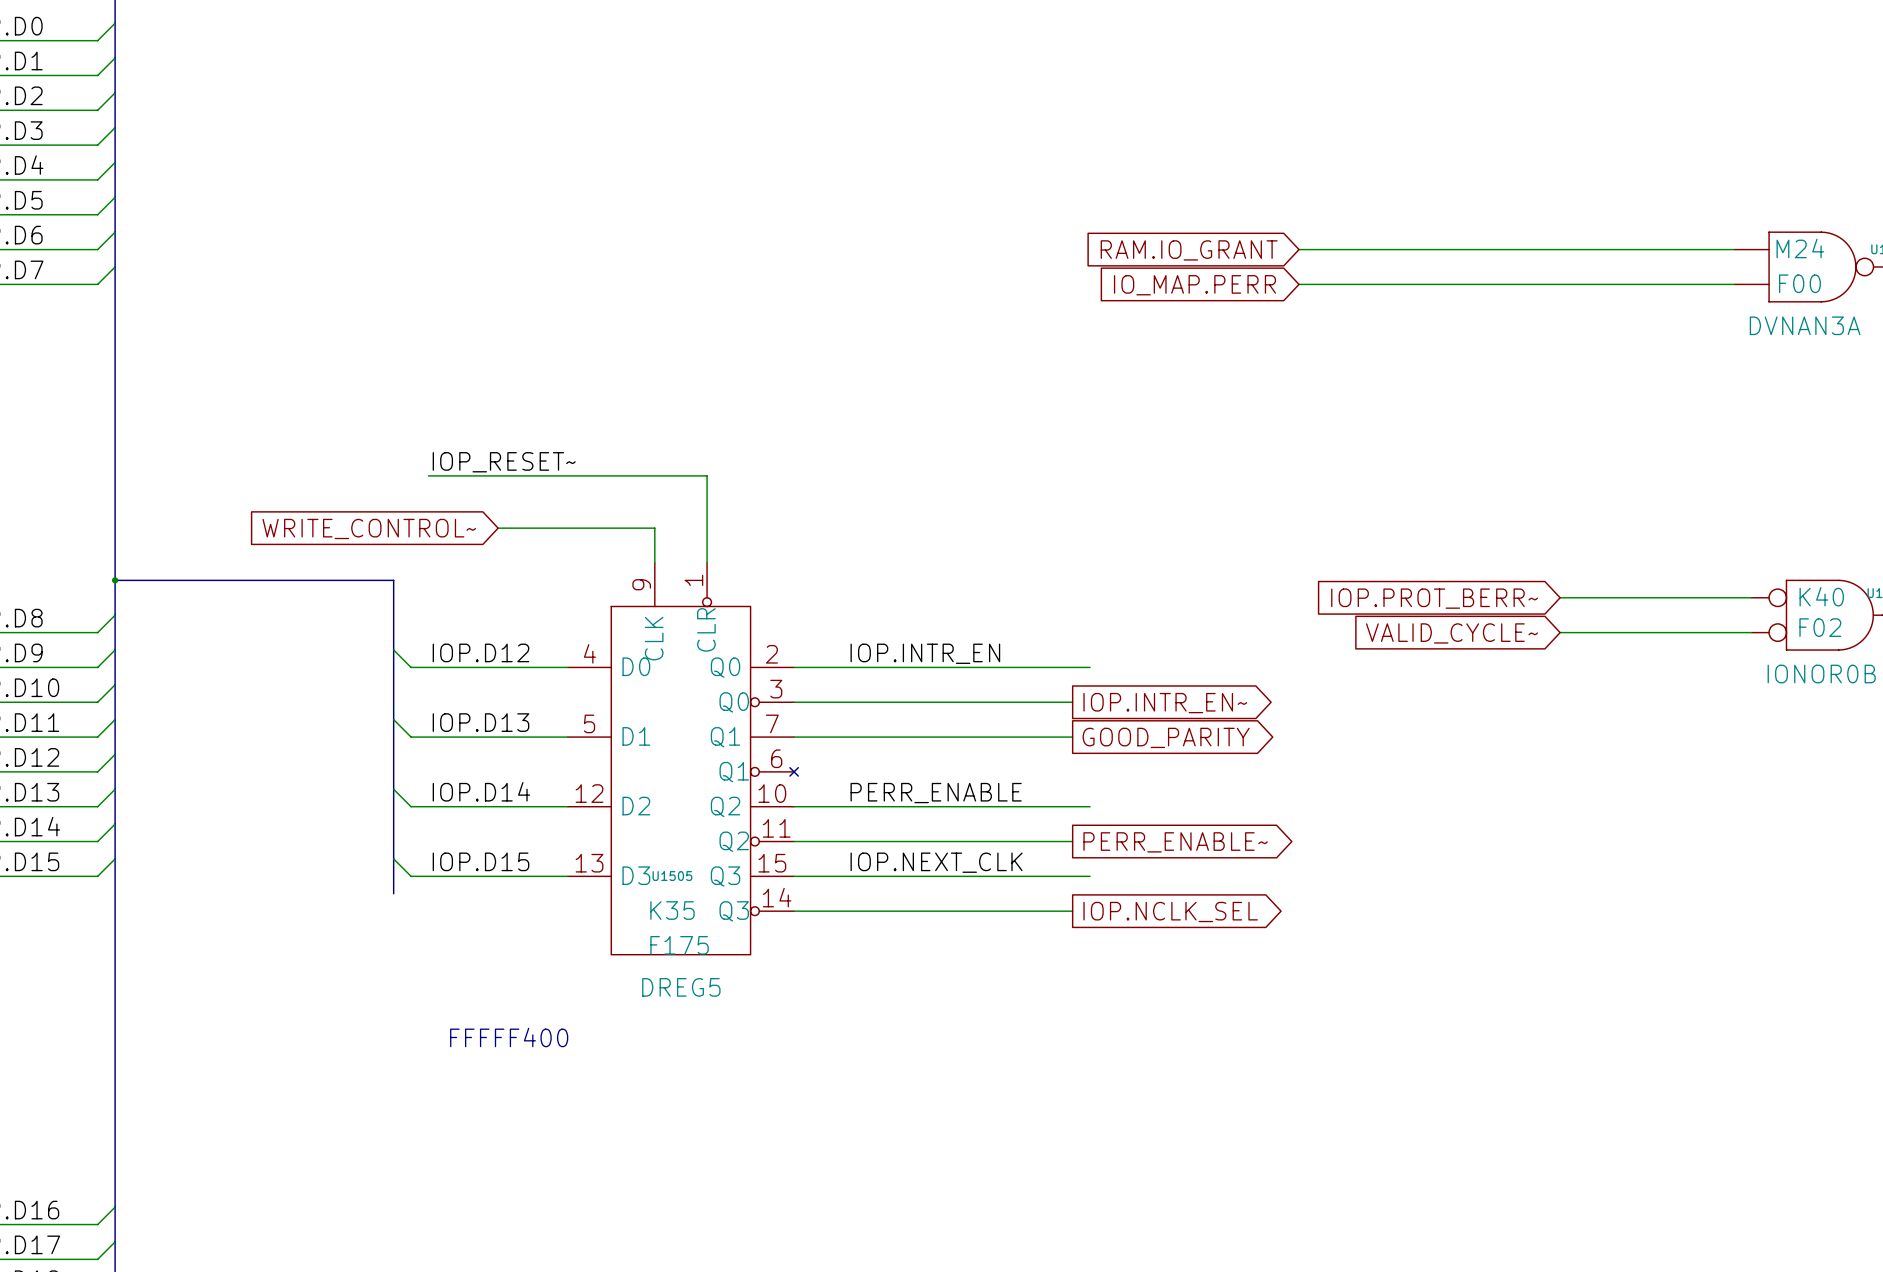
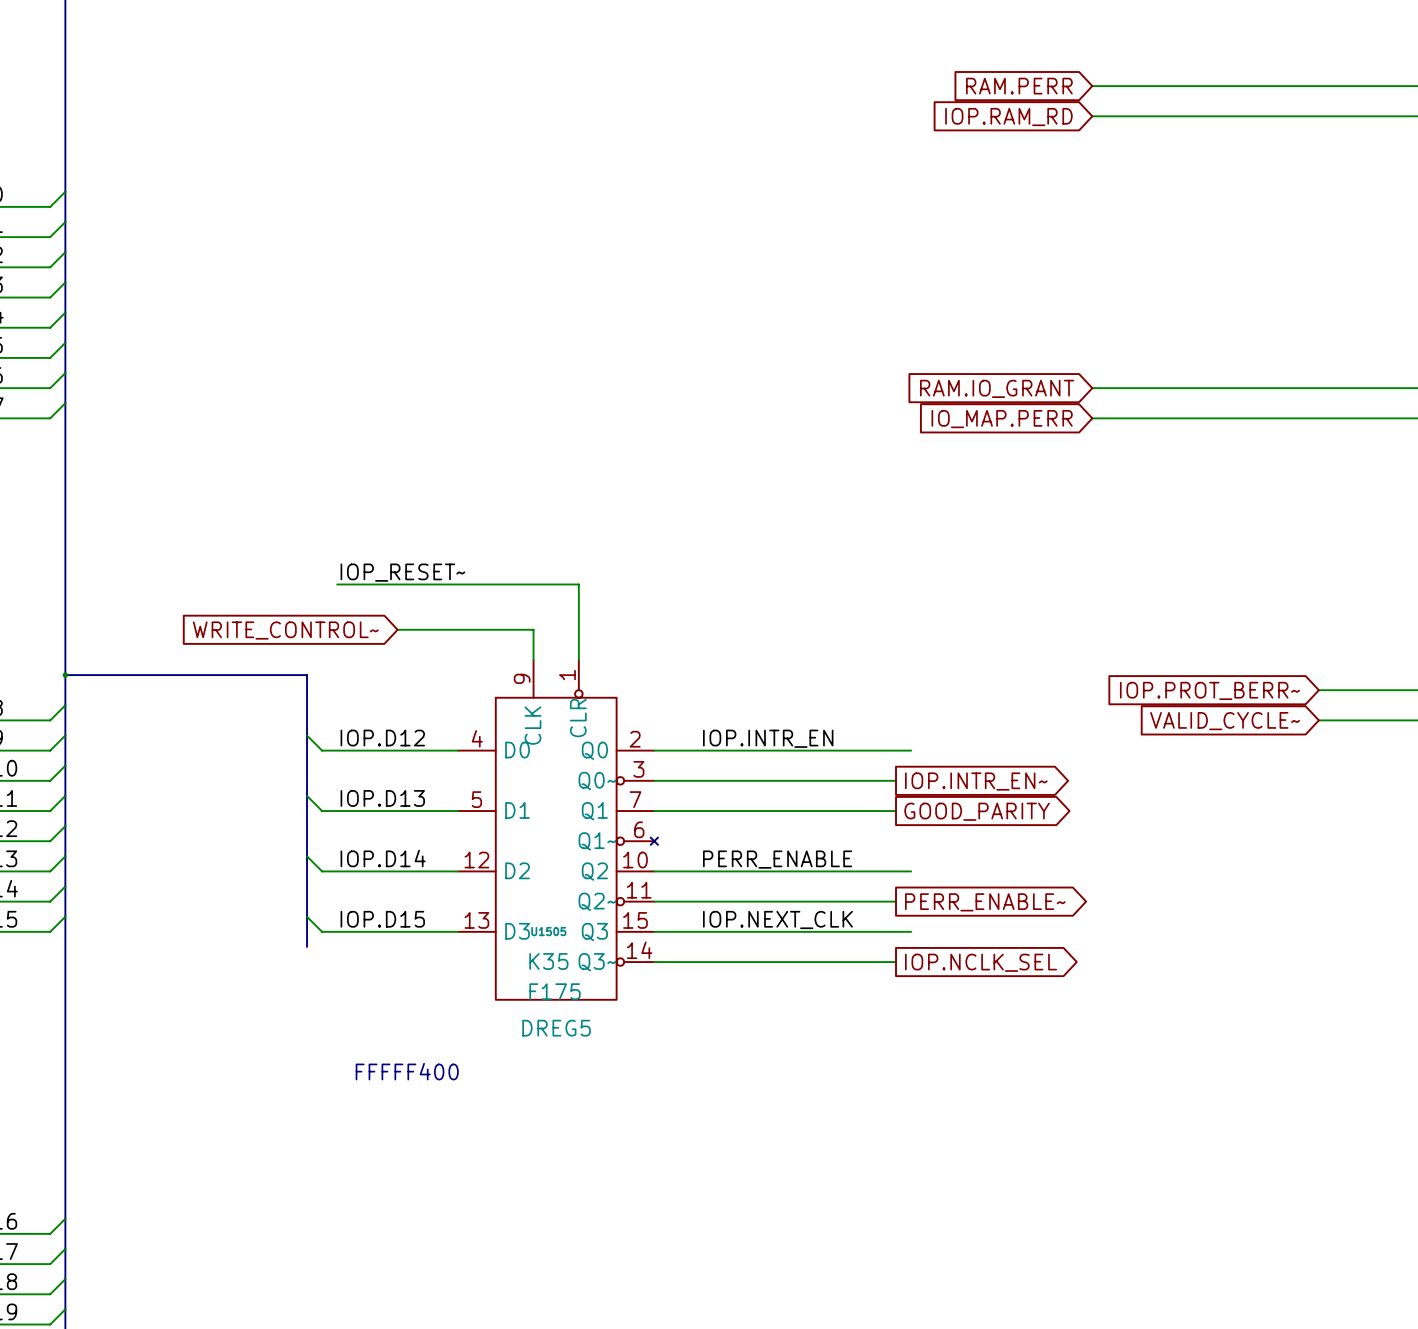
U1505 pin name: Q0 (734, 702) -> Q0~ (597, 780)
U1505 pin name: Q1 (734, 772) -> Q1~ (597, 841)
U1505 pin name: Q2 (734, 841) -> Q2~ (597, 901)
U1505 pin name: Q3 (734, 911) -> Q3~ (597, 962)

